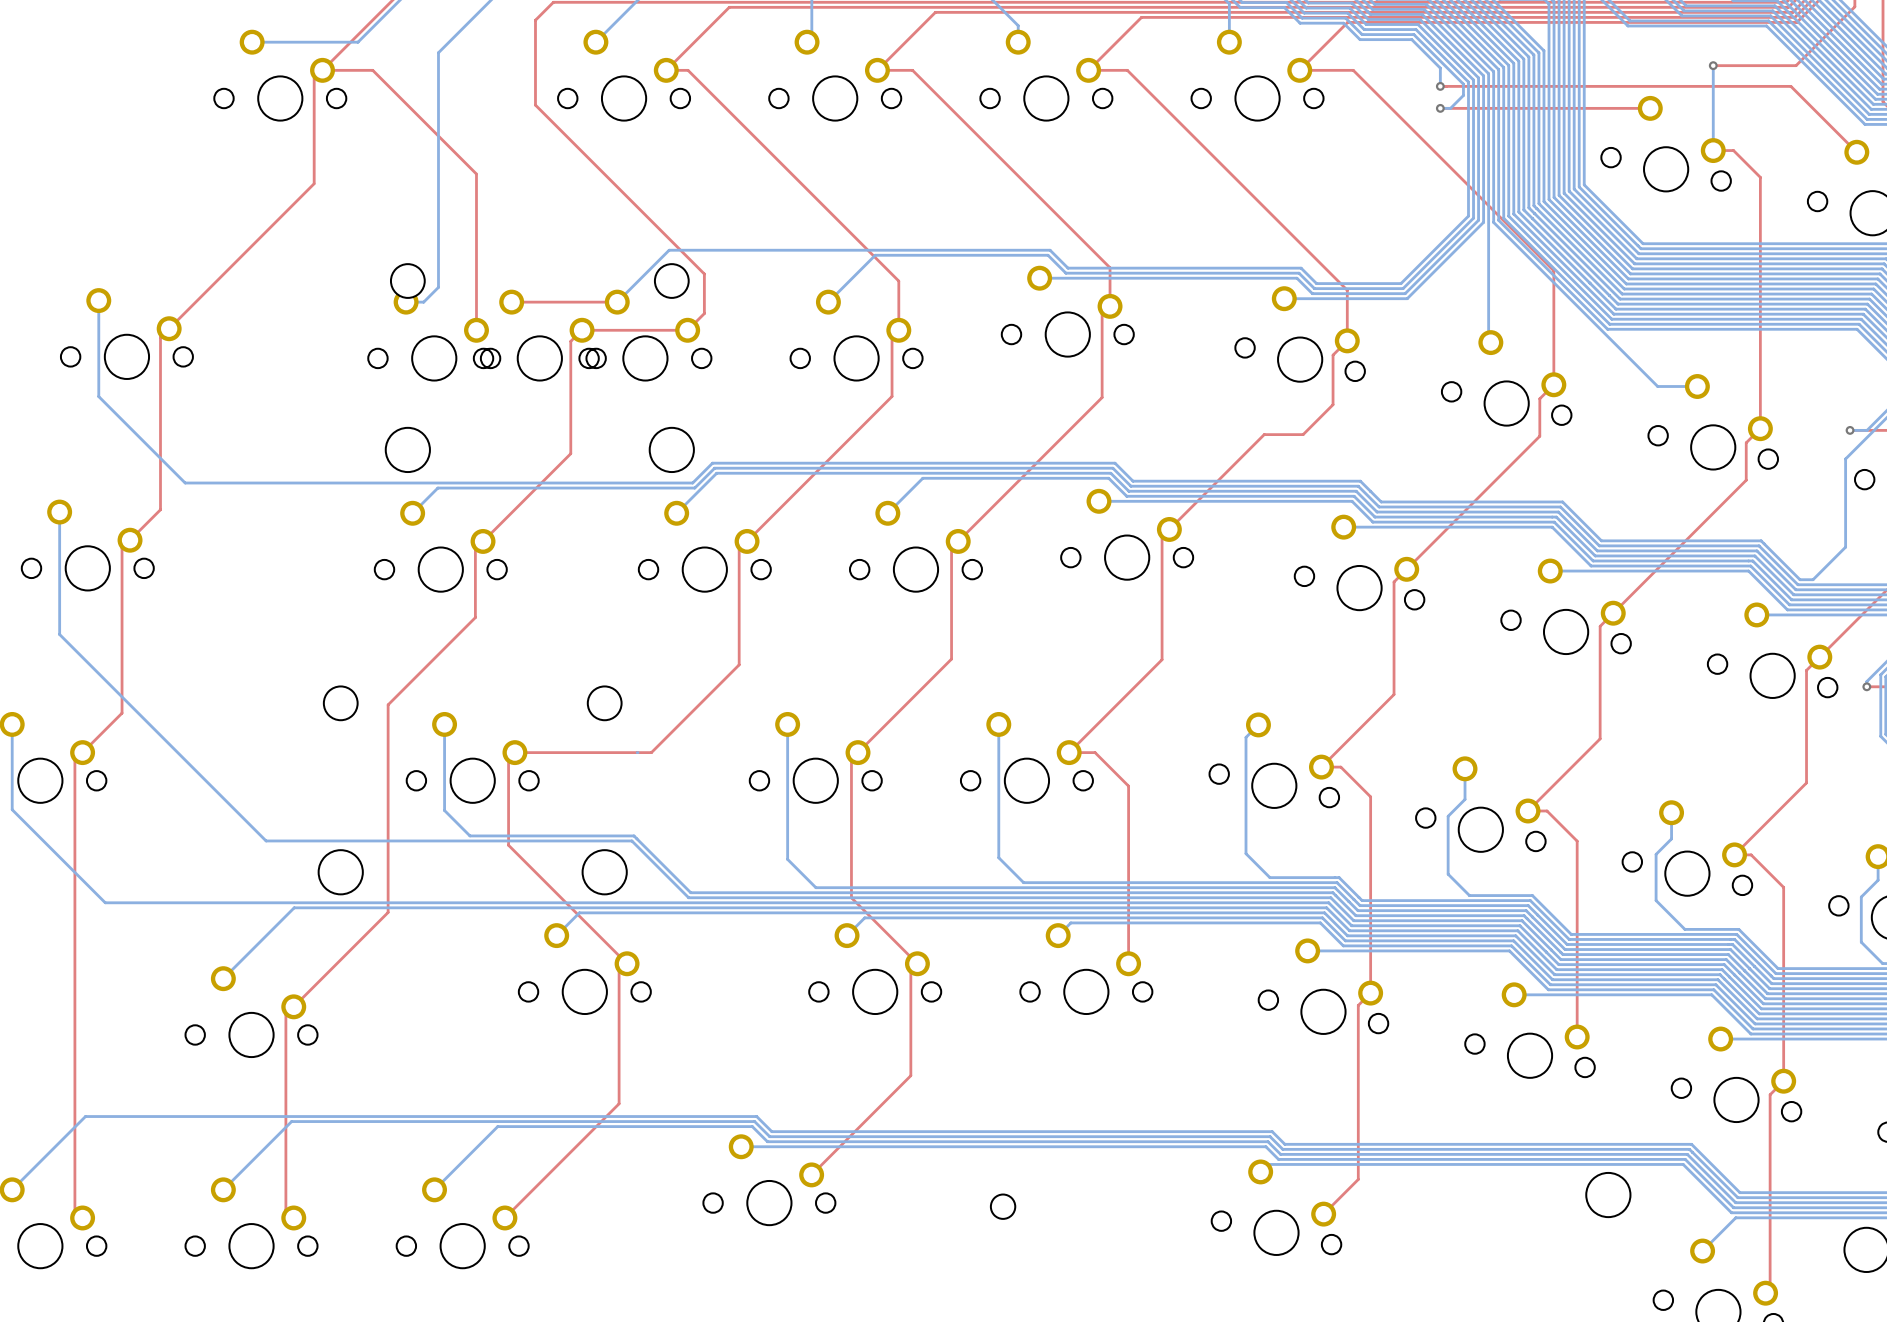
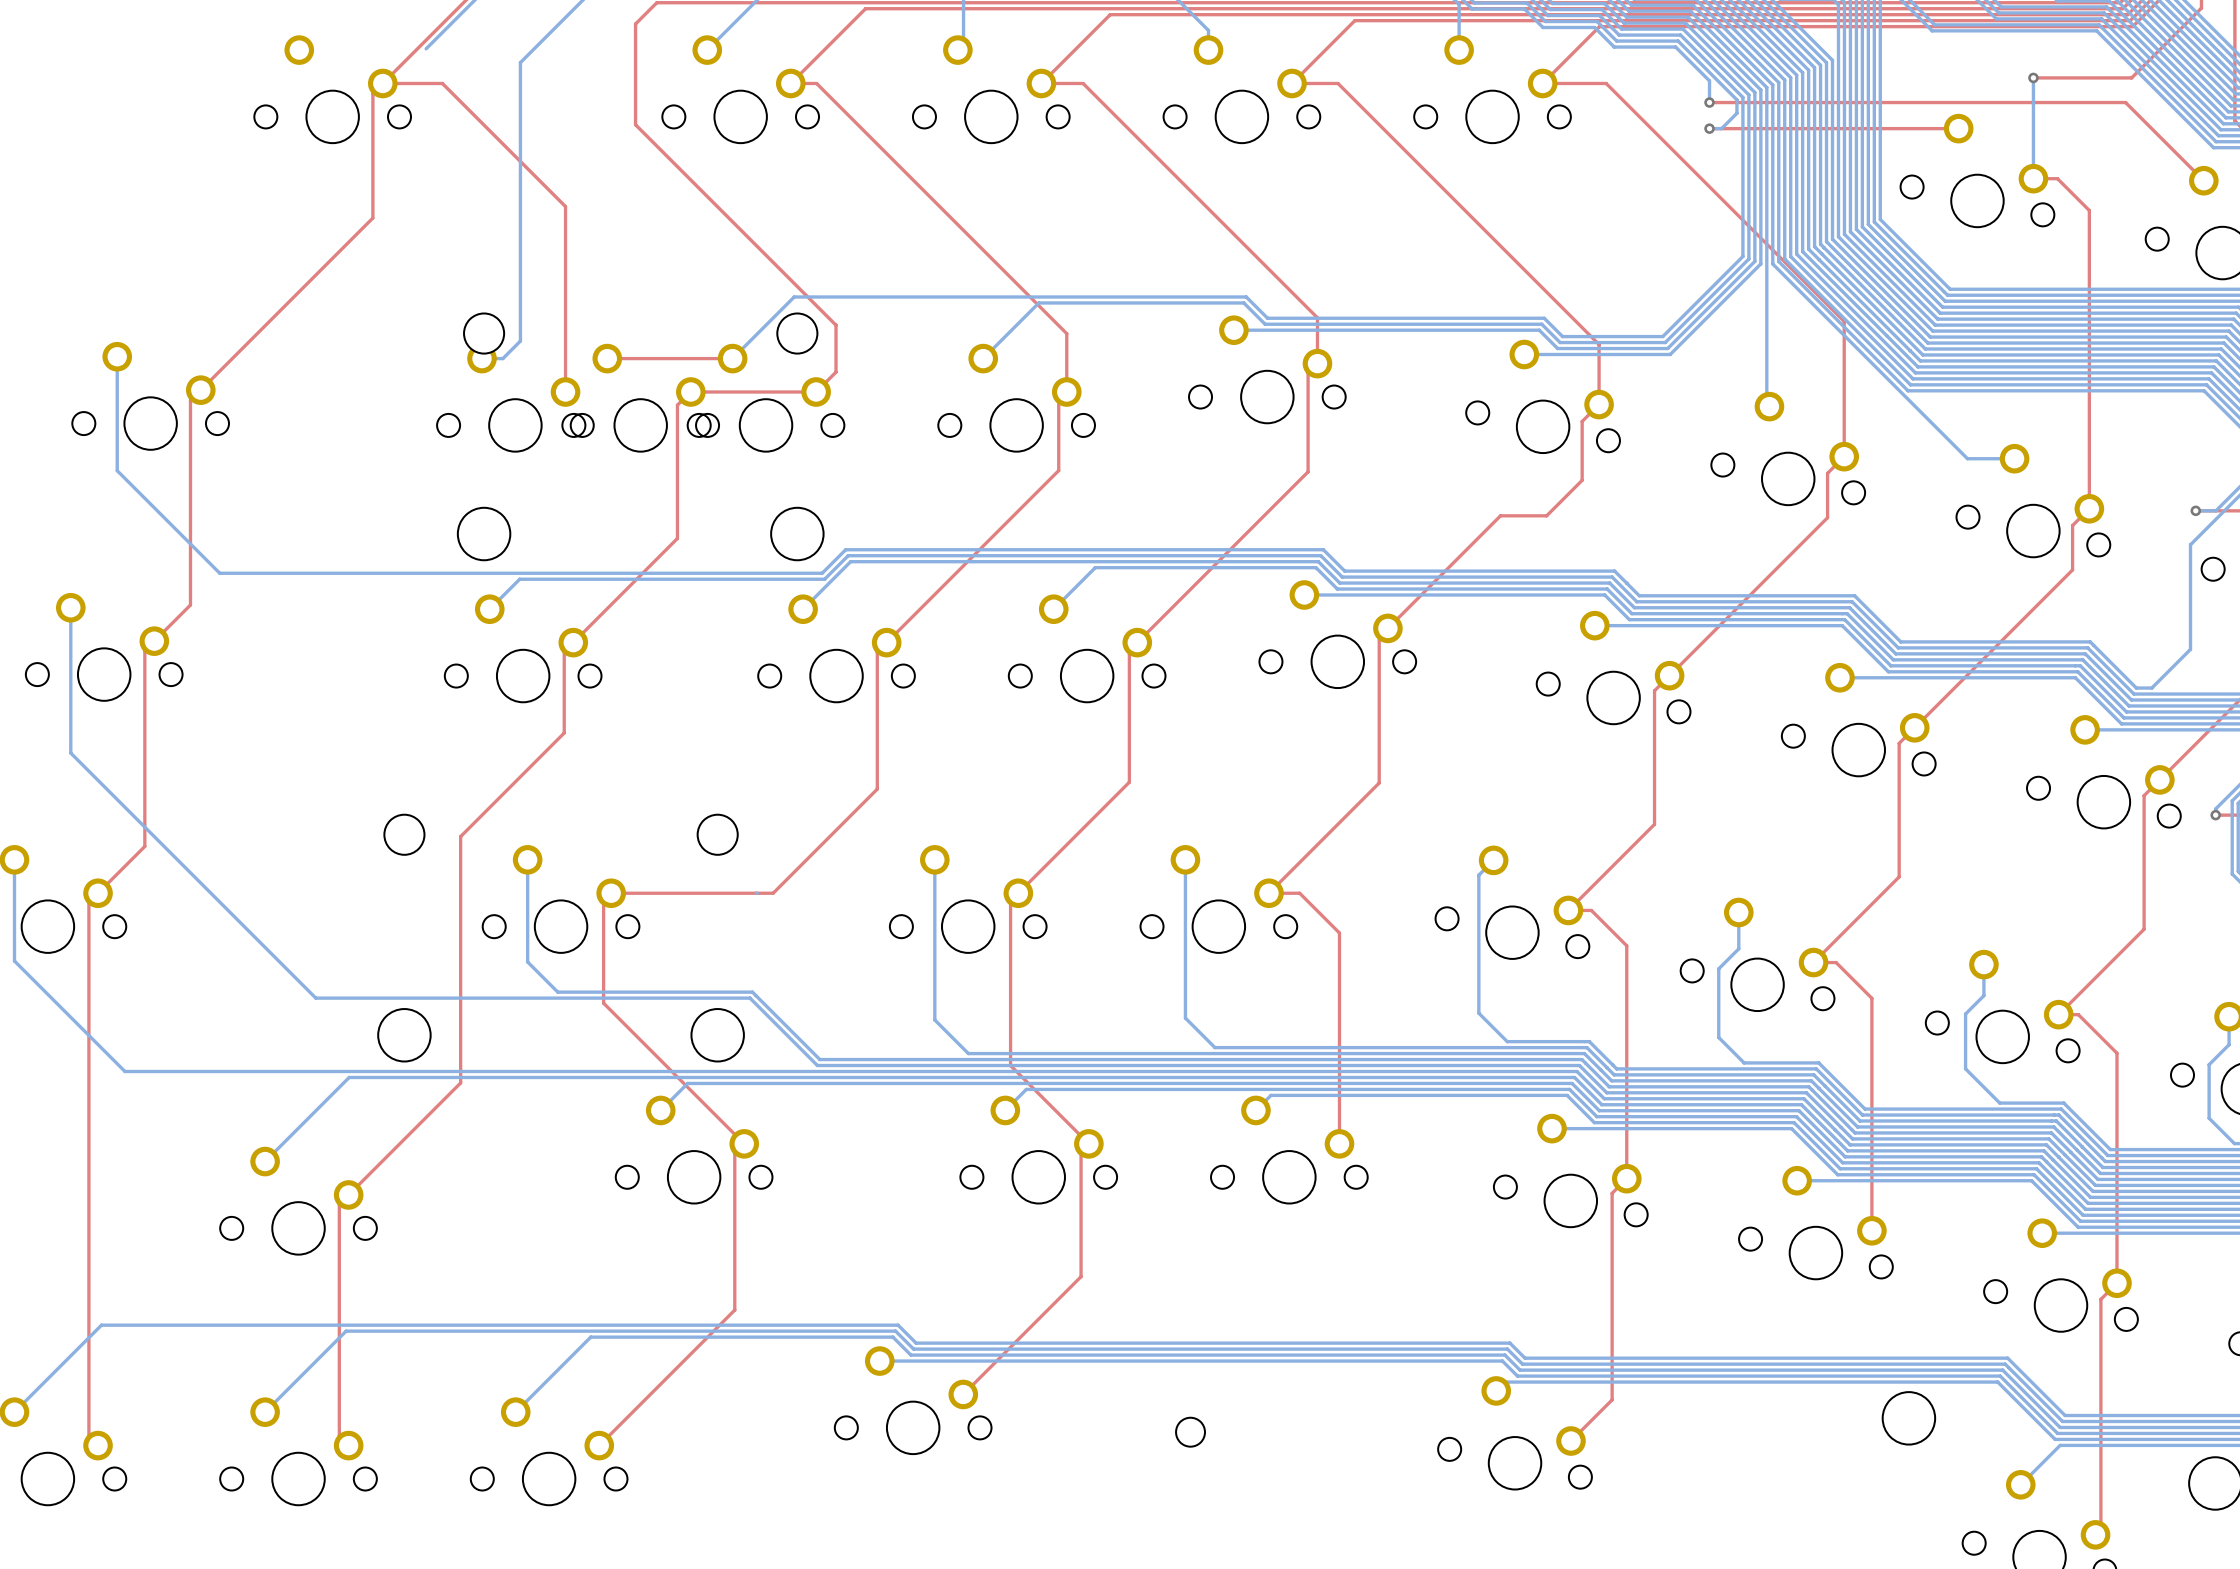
bottom track: (359, 41) (252, 42) -> none

